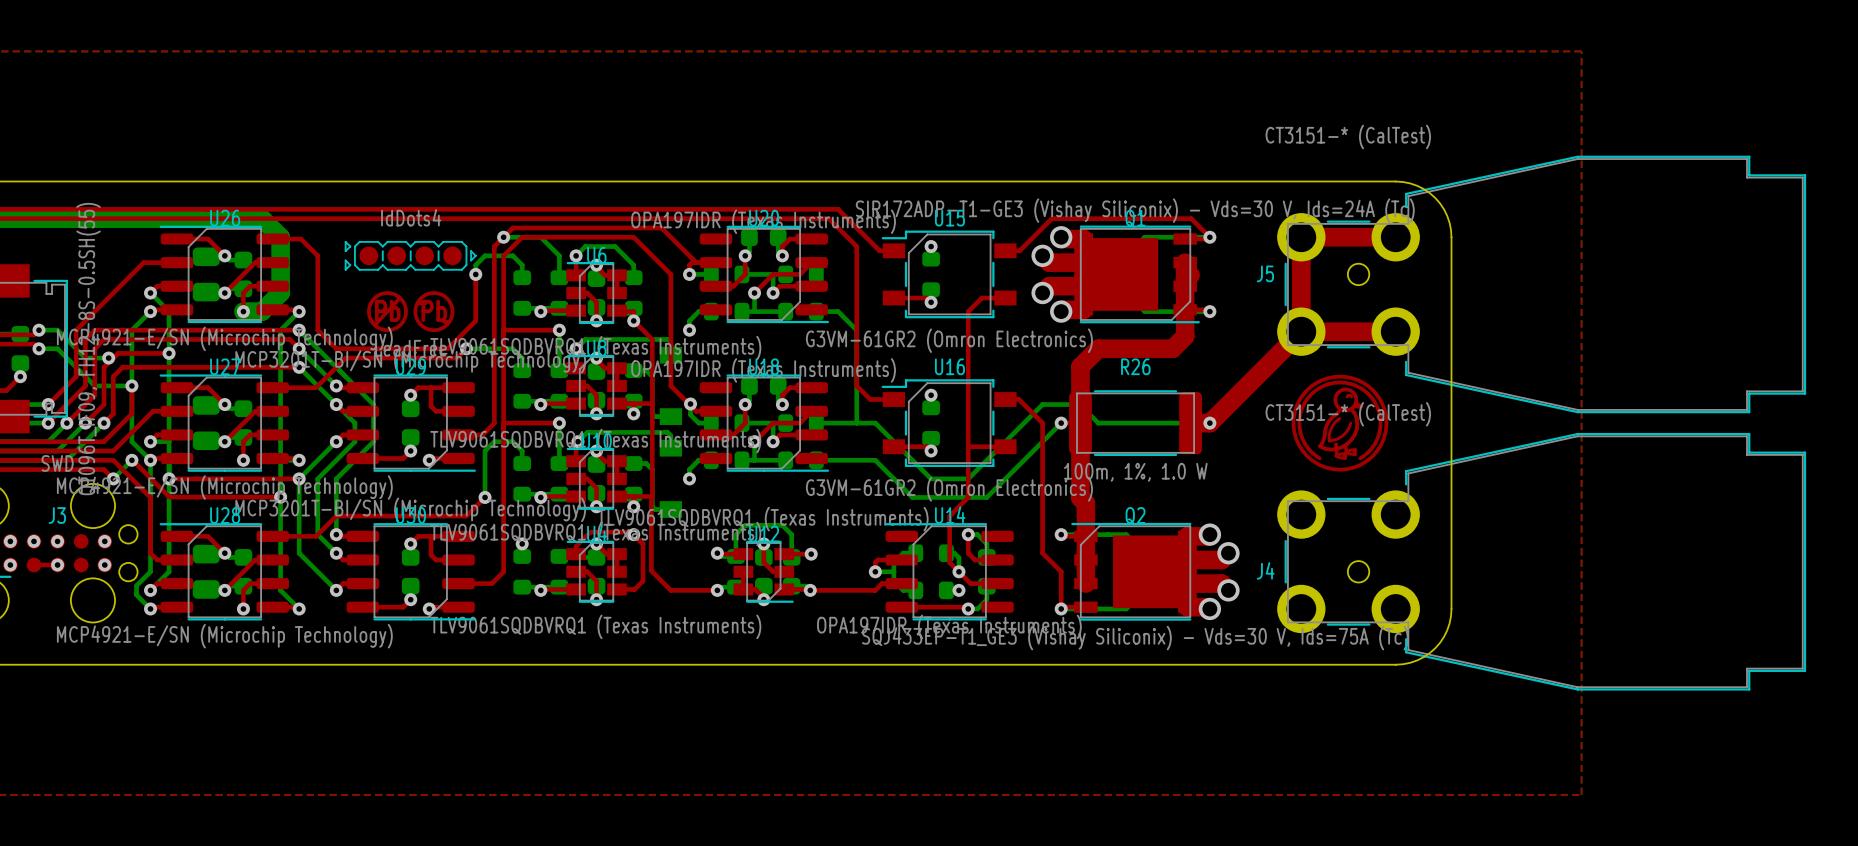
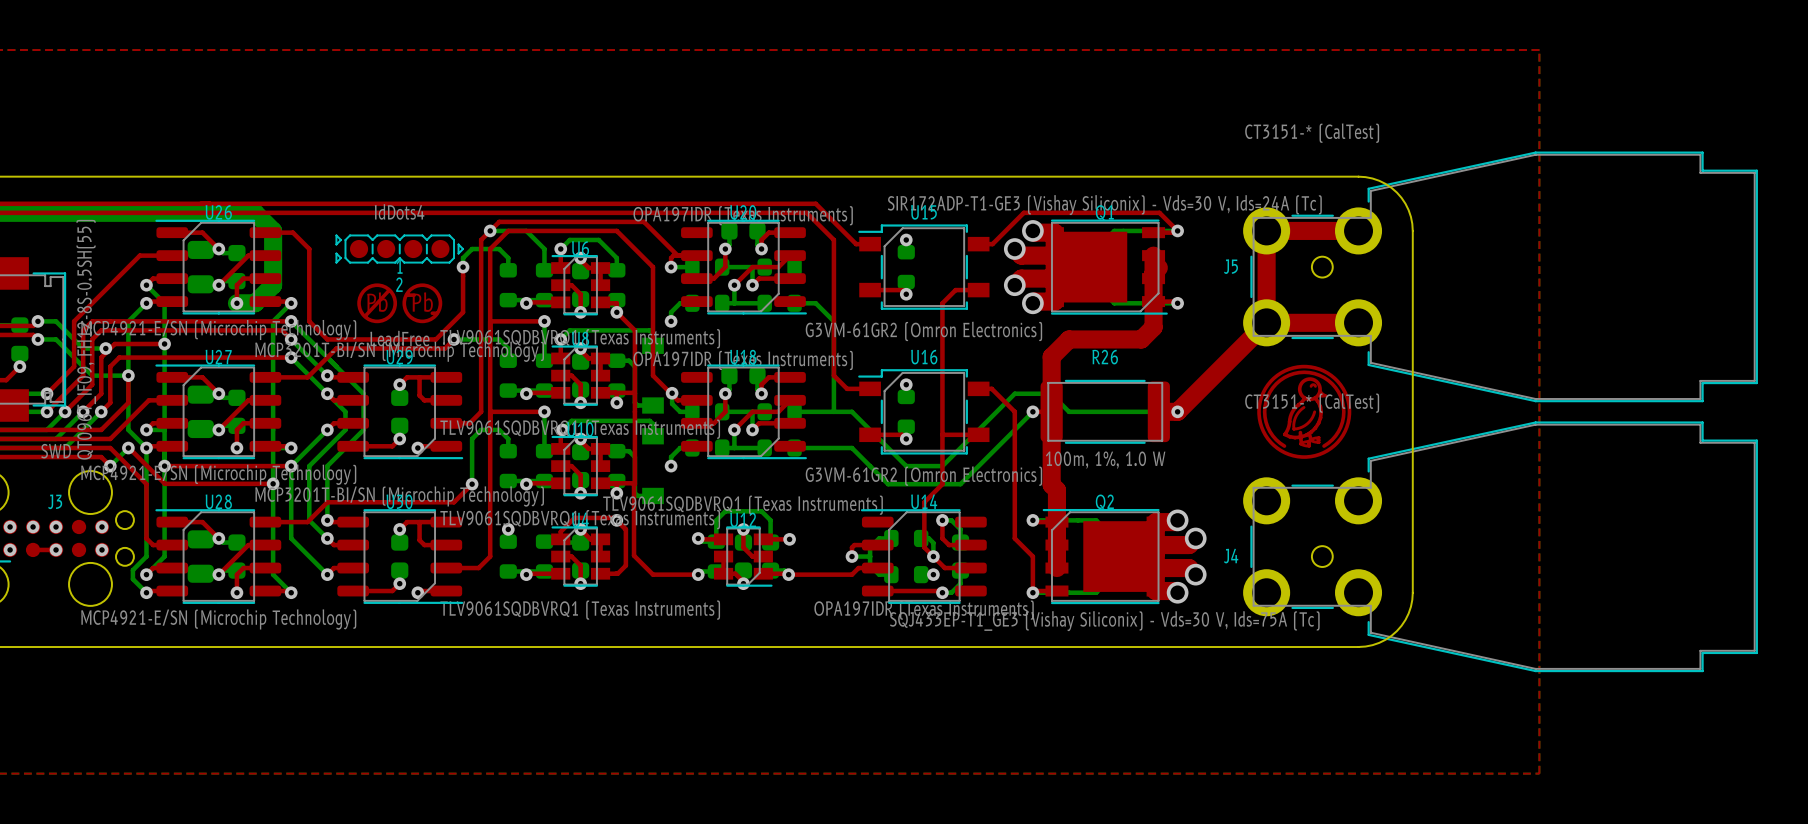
drawing: [344, 240, 477, 333] -> none
2: none -> IdDots4 (399, 249)
1: none -> LeadFree (399, 303)

